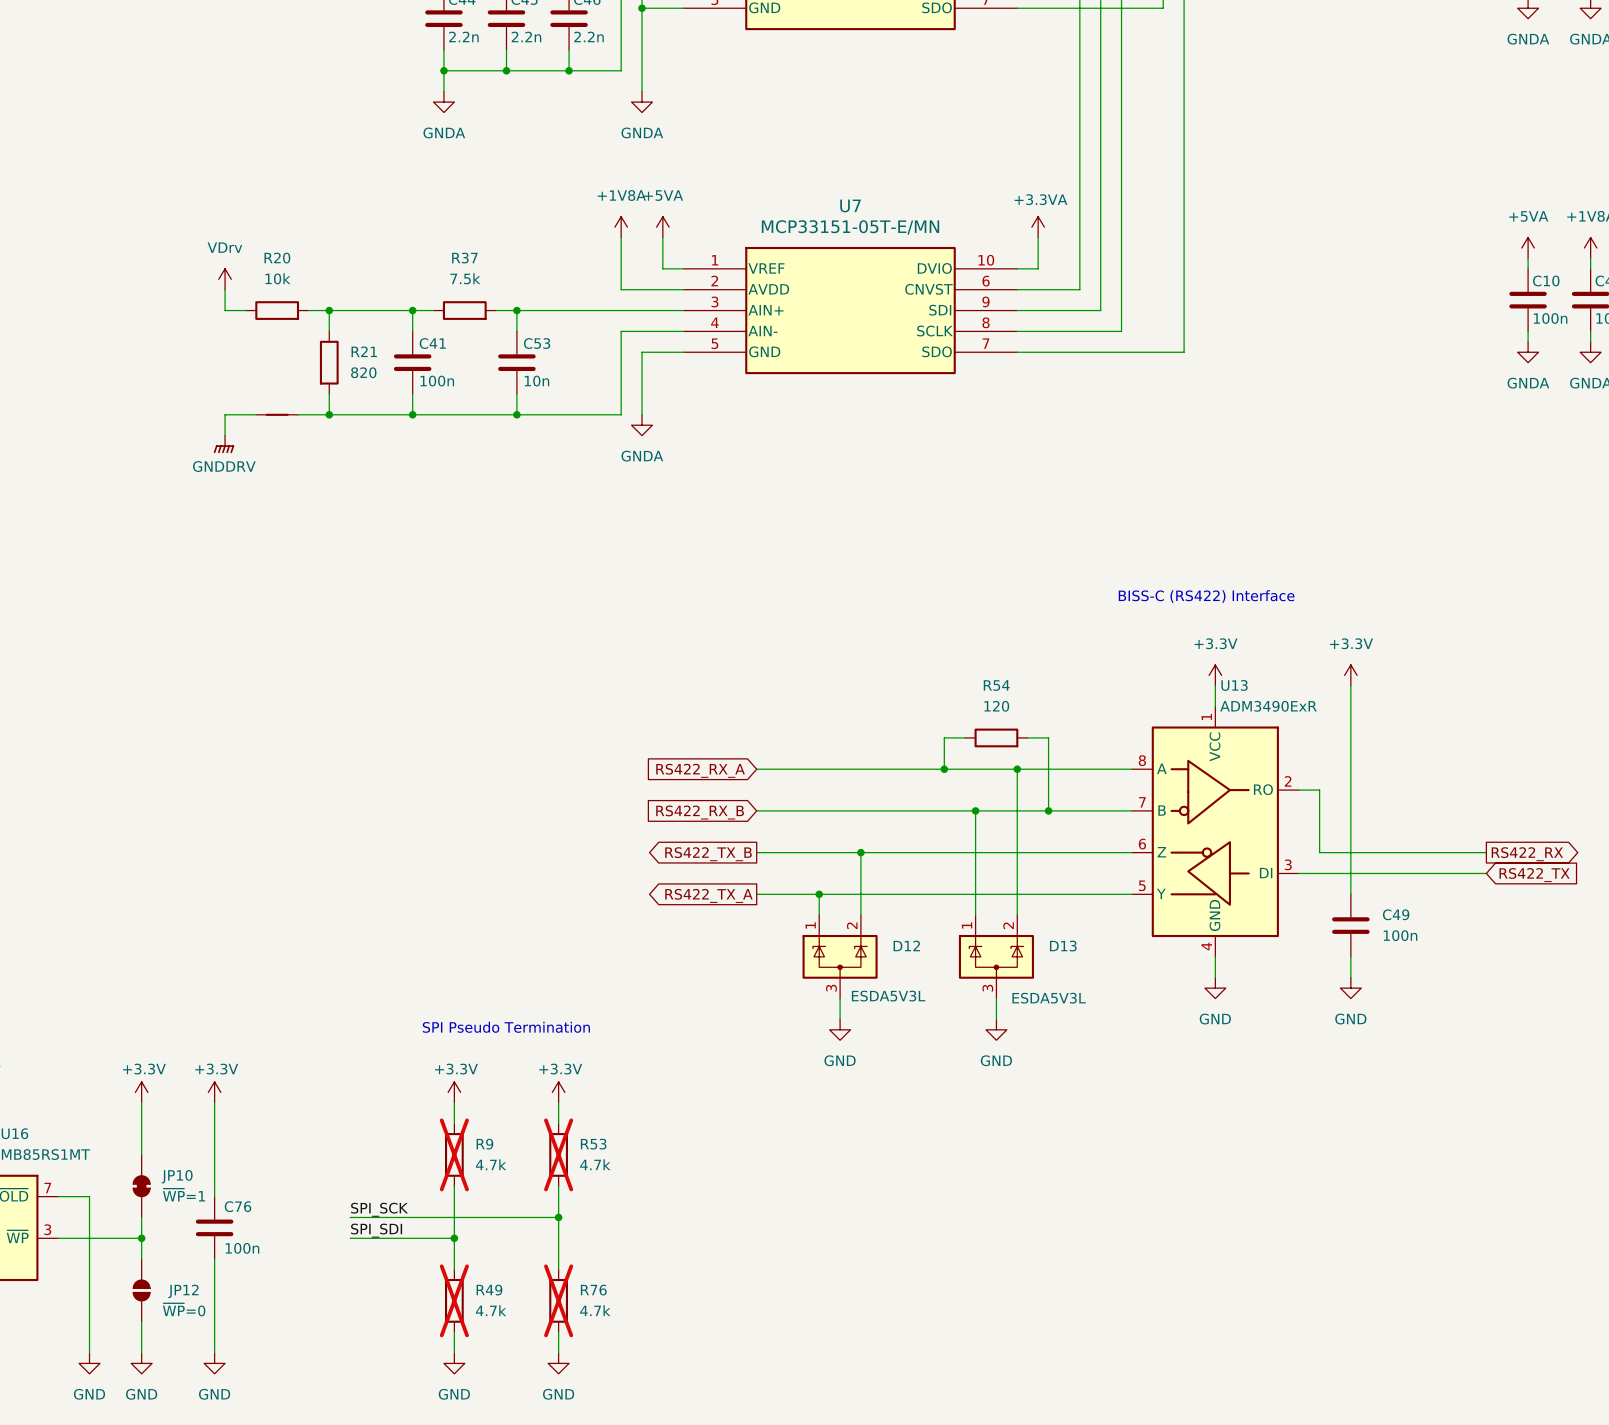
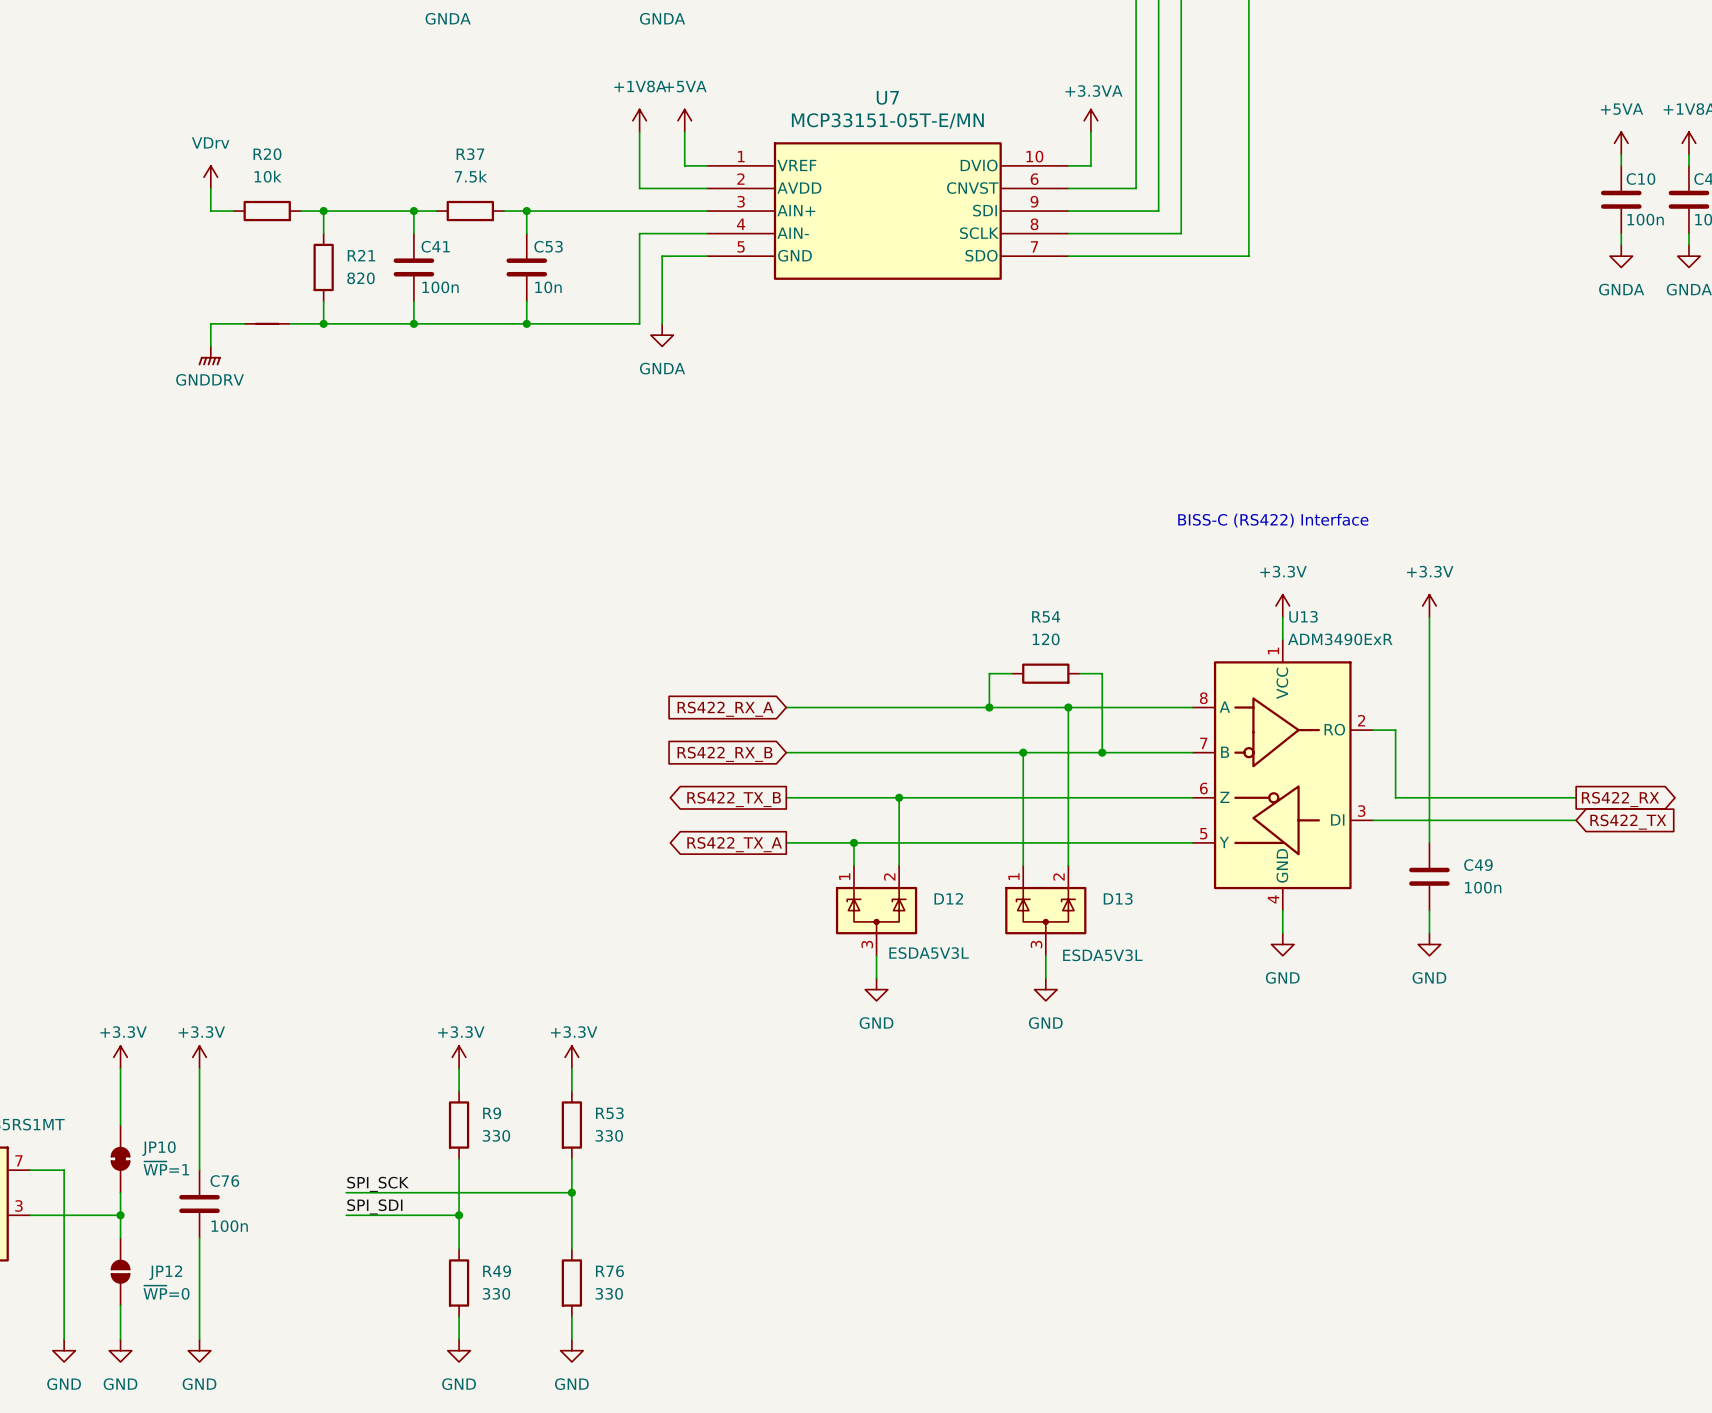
text: SPI Pseudo Termination (506, 1027) -> none
R9 do-not-place cross: (454, 1154) -> none
R53 do-not-place cross: (558, 1154) -> none
R9 value: 4.7k (491, 1164) -> 330 (496, 1135)
R53 value: 4.7k (595, 1164) -> 330 (609, 1135)
R49 do-not-place cross: (454, 1300) -> none
R76 do-not-place cross: (558, 1300) -> none
R49 value: 4.7k (491, 1310) -> 330 (496, 1293)
R76 value: 4.7k (595, 1310) -> 330 (609, 1293)

